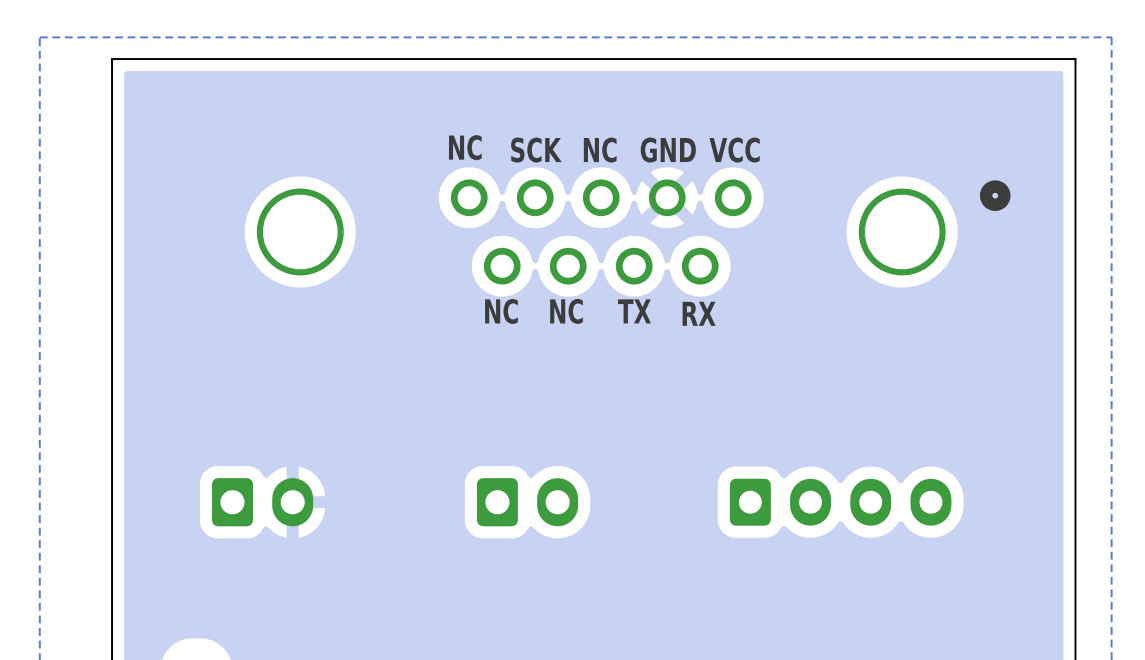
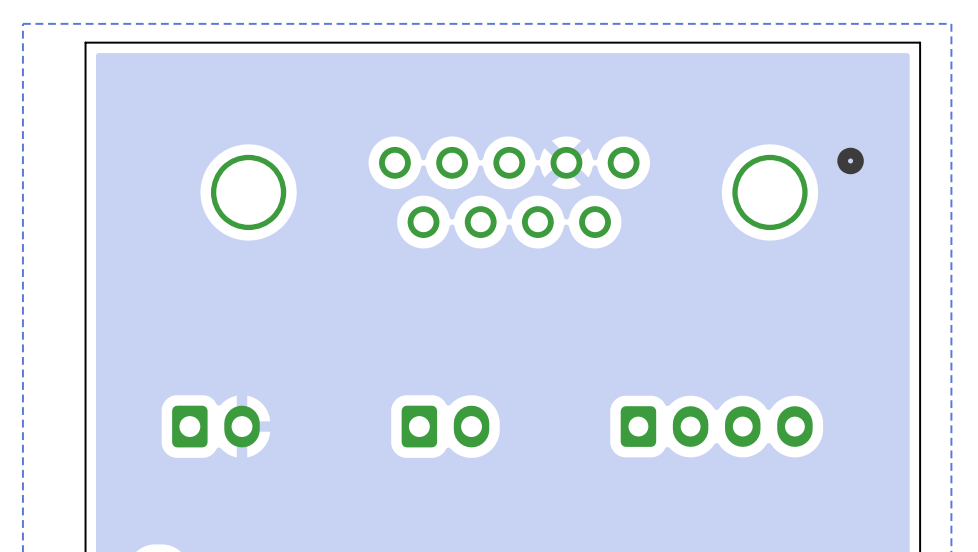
text: NC (465, 147) -> none
text: SCK (536, 150) -> none
text: NC (600, 150) -> none
text: GND (668, 150) -> none
text: VCC (734, 150) -> none
text: NC (501, 311) -> none
text: NC (566, 311) -> none
text: TX (634, 311) -> none
text: RX (699, 313) -> none

